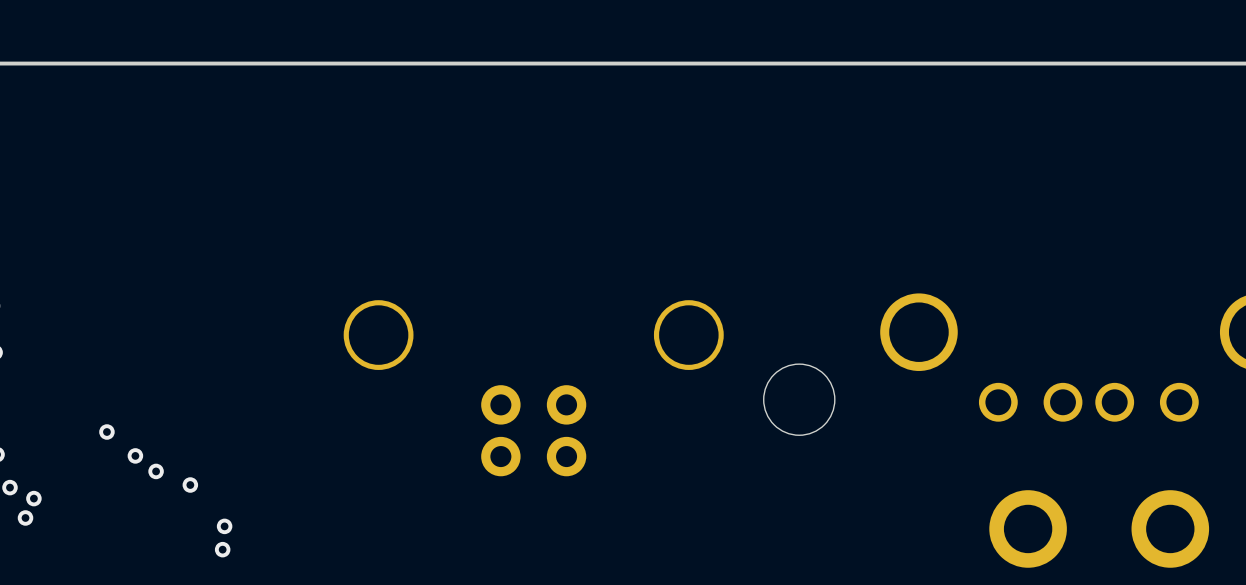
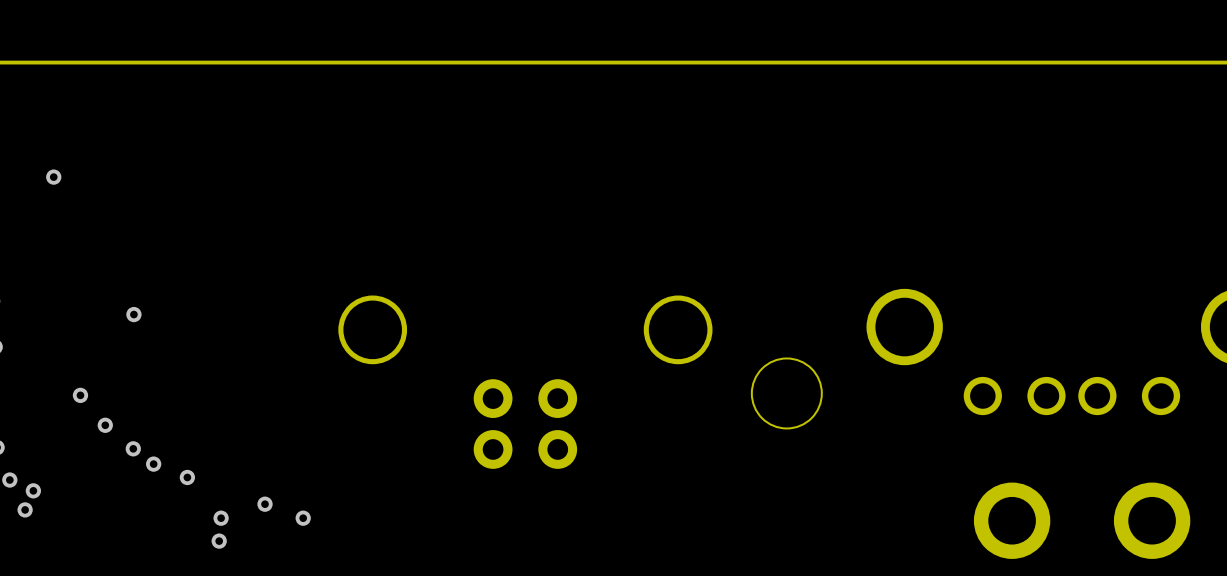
via: none -> (53, 177)
via: none -> (133, 314)
via: none -> (80, 395)
via: none -> (265, 504)
via: none -> (303, 518)

